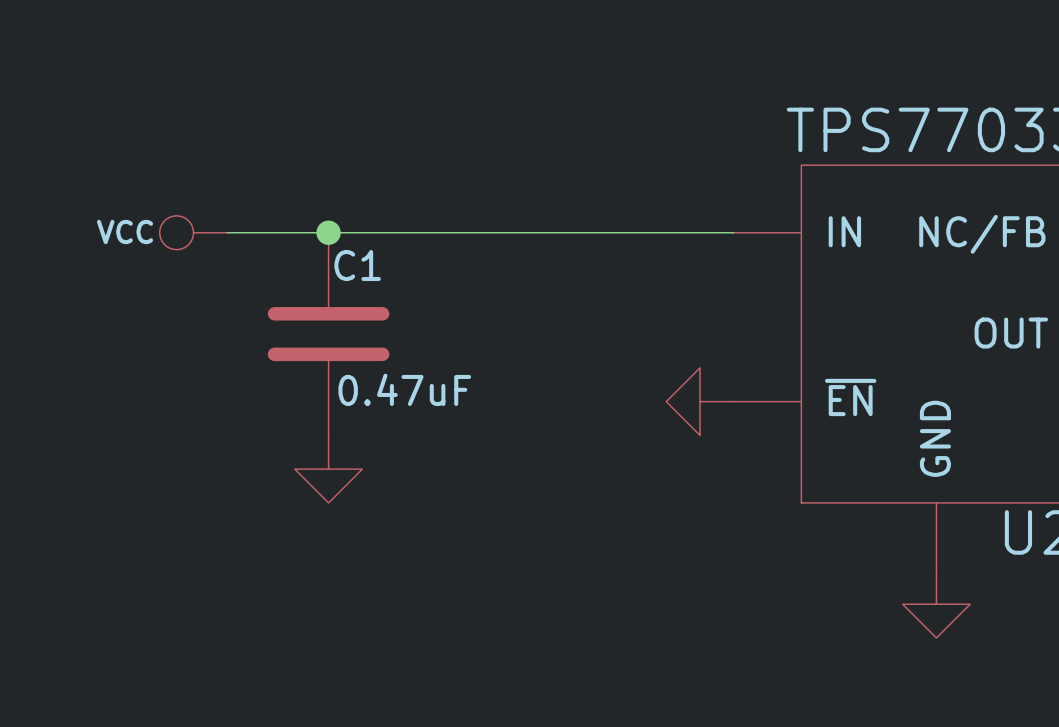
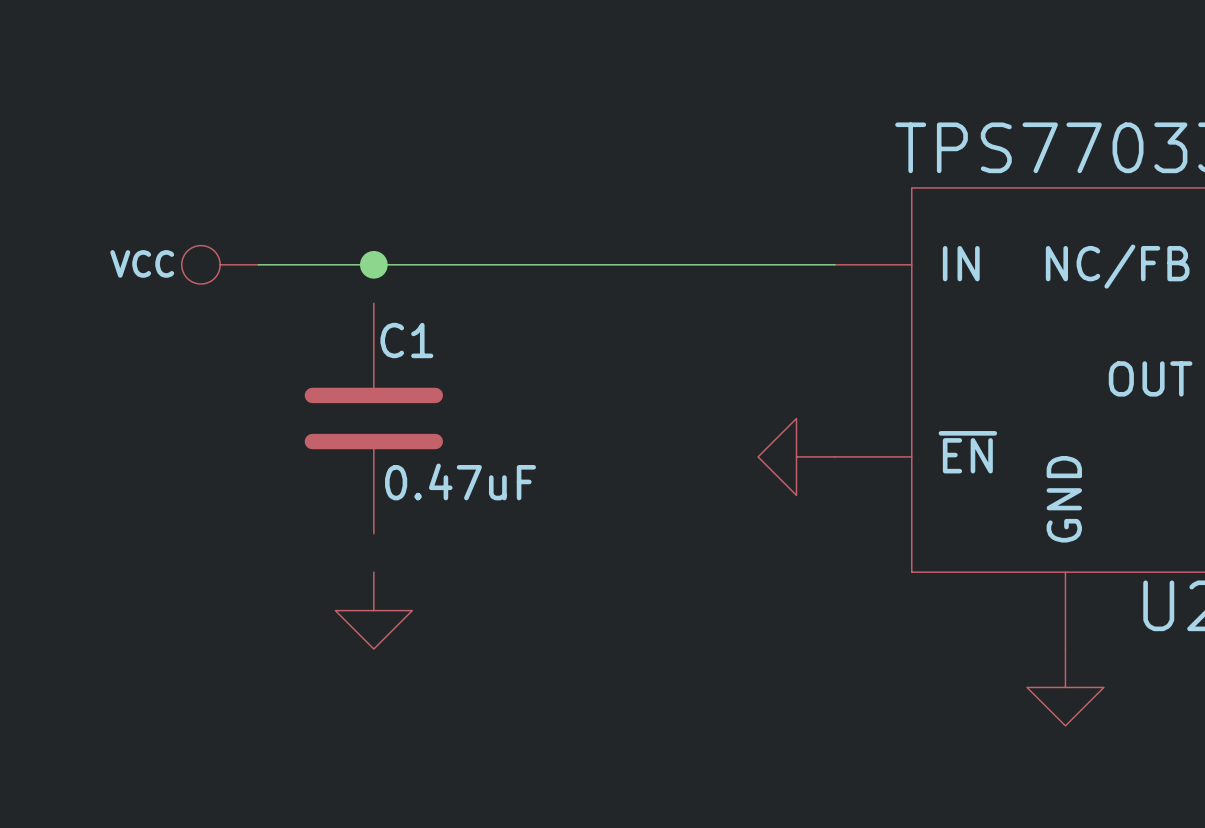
C1 position: (328, 334) -> (373, 418)
power symbol position: (328, 469) -> (373, 610)

